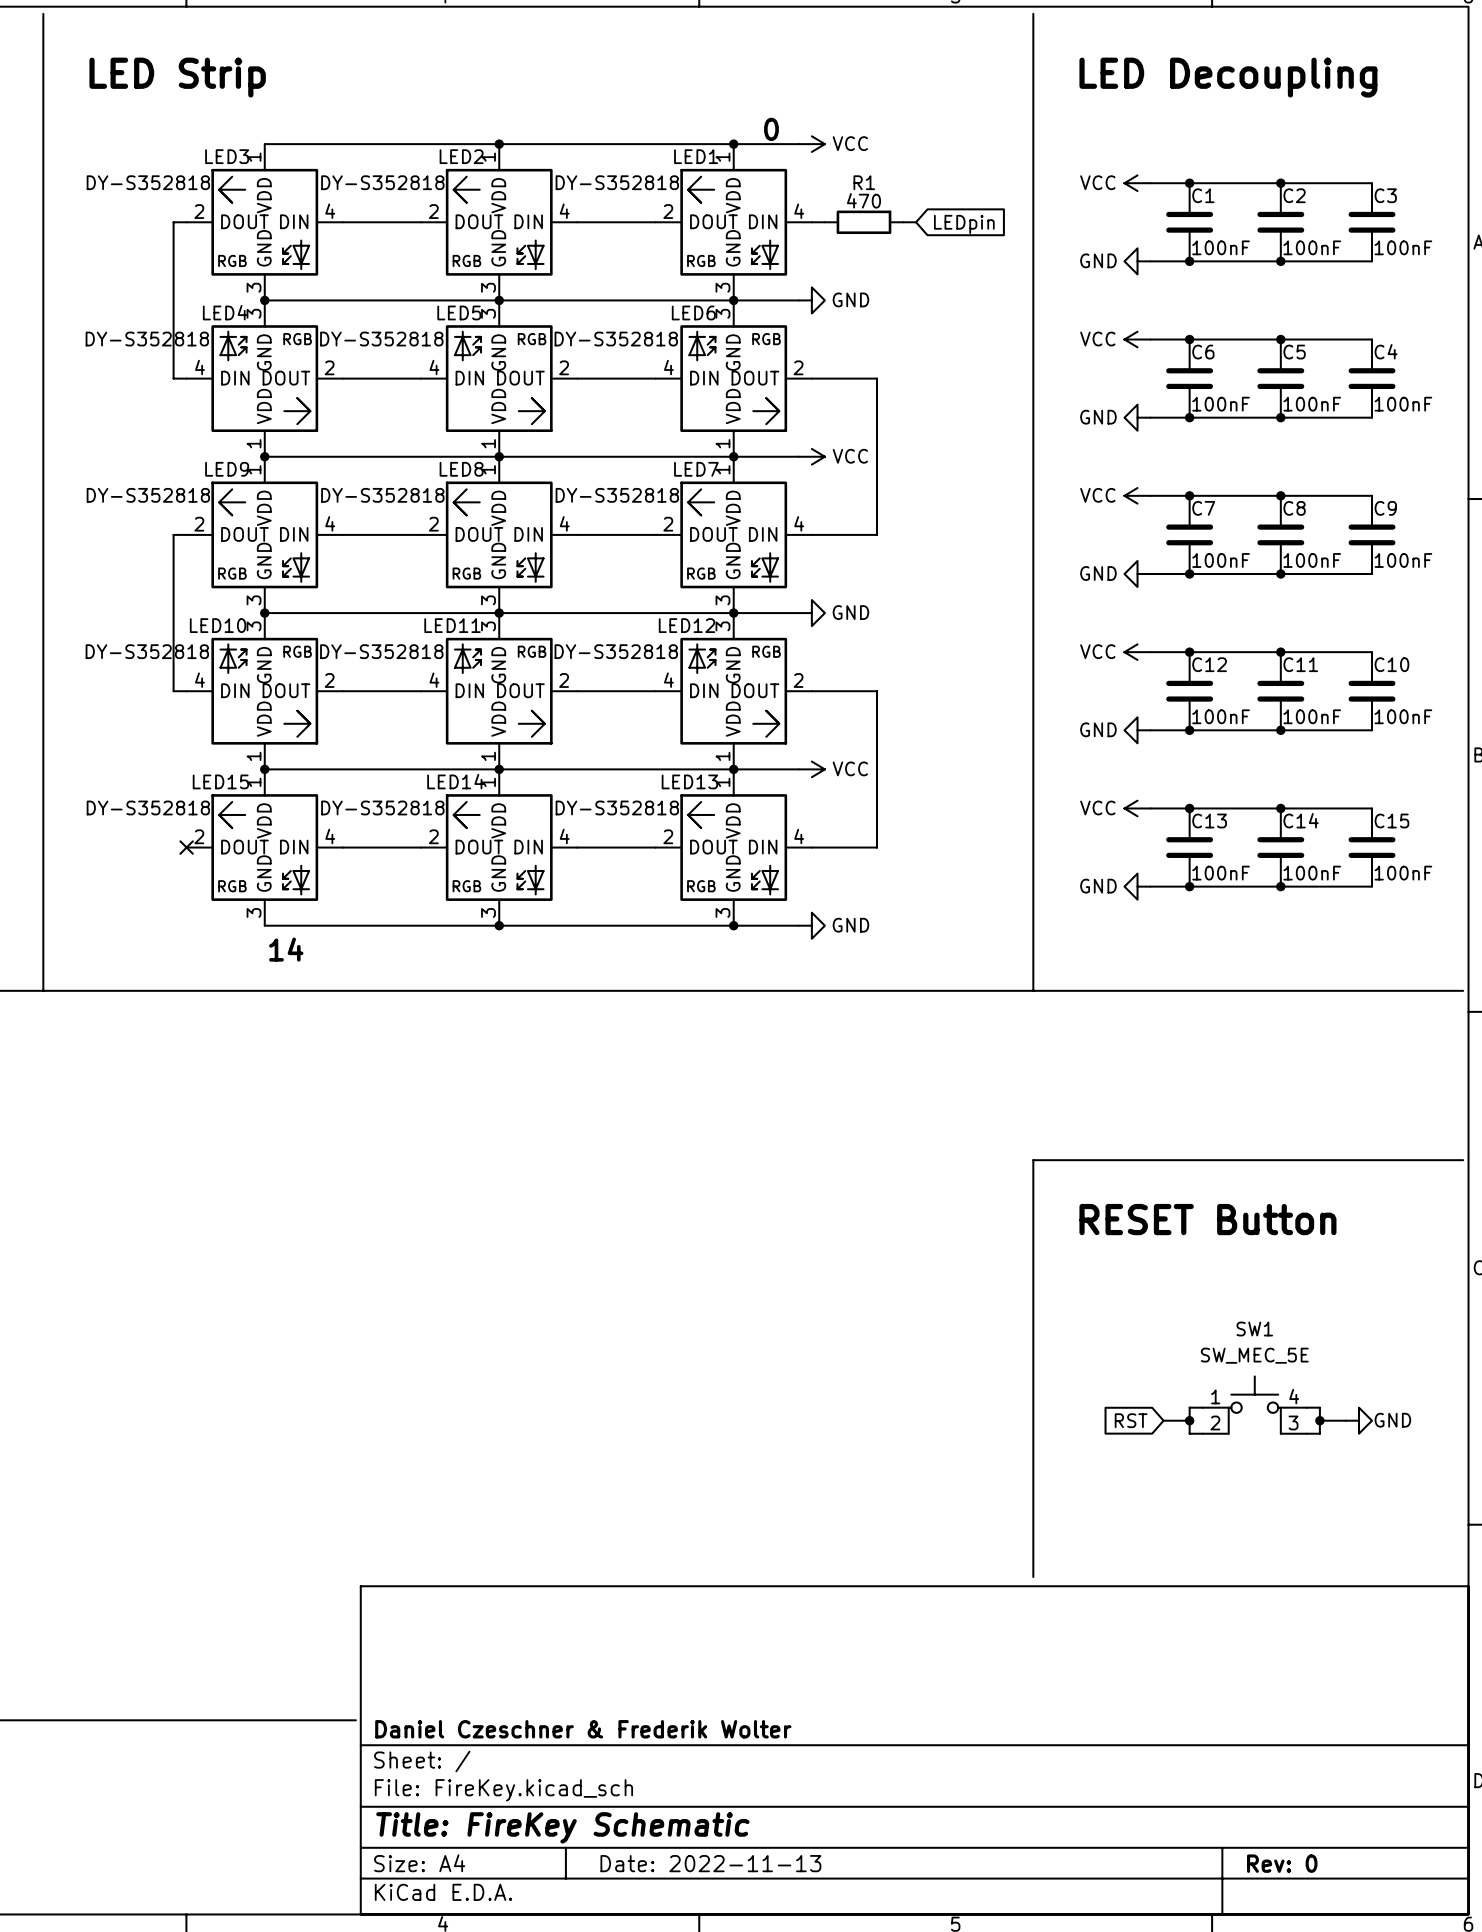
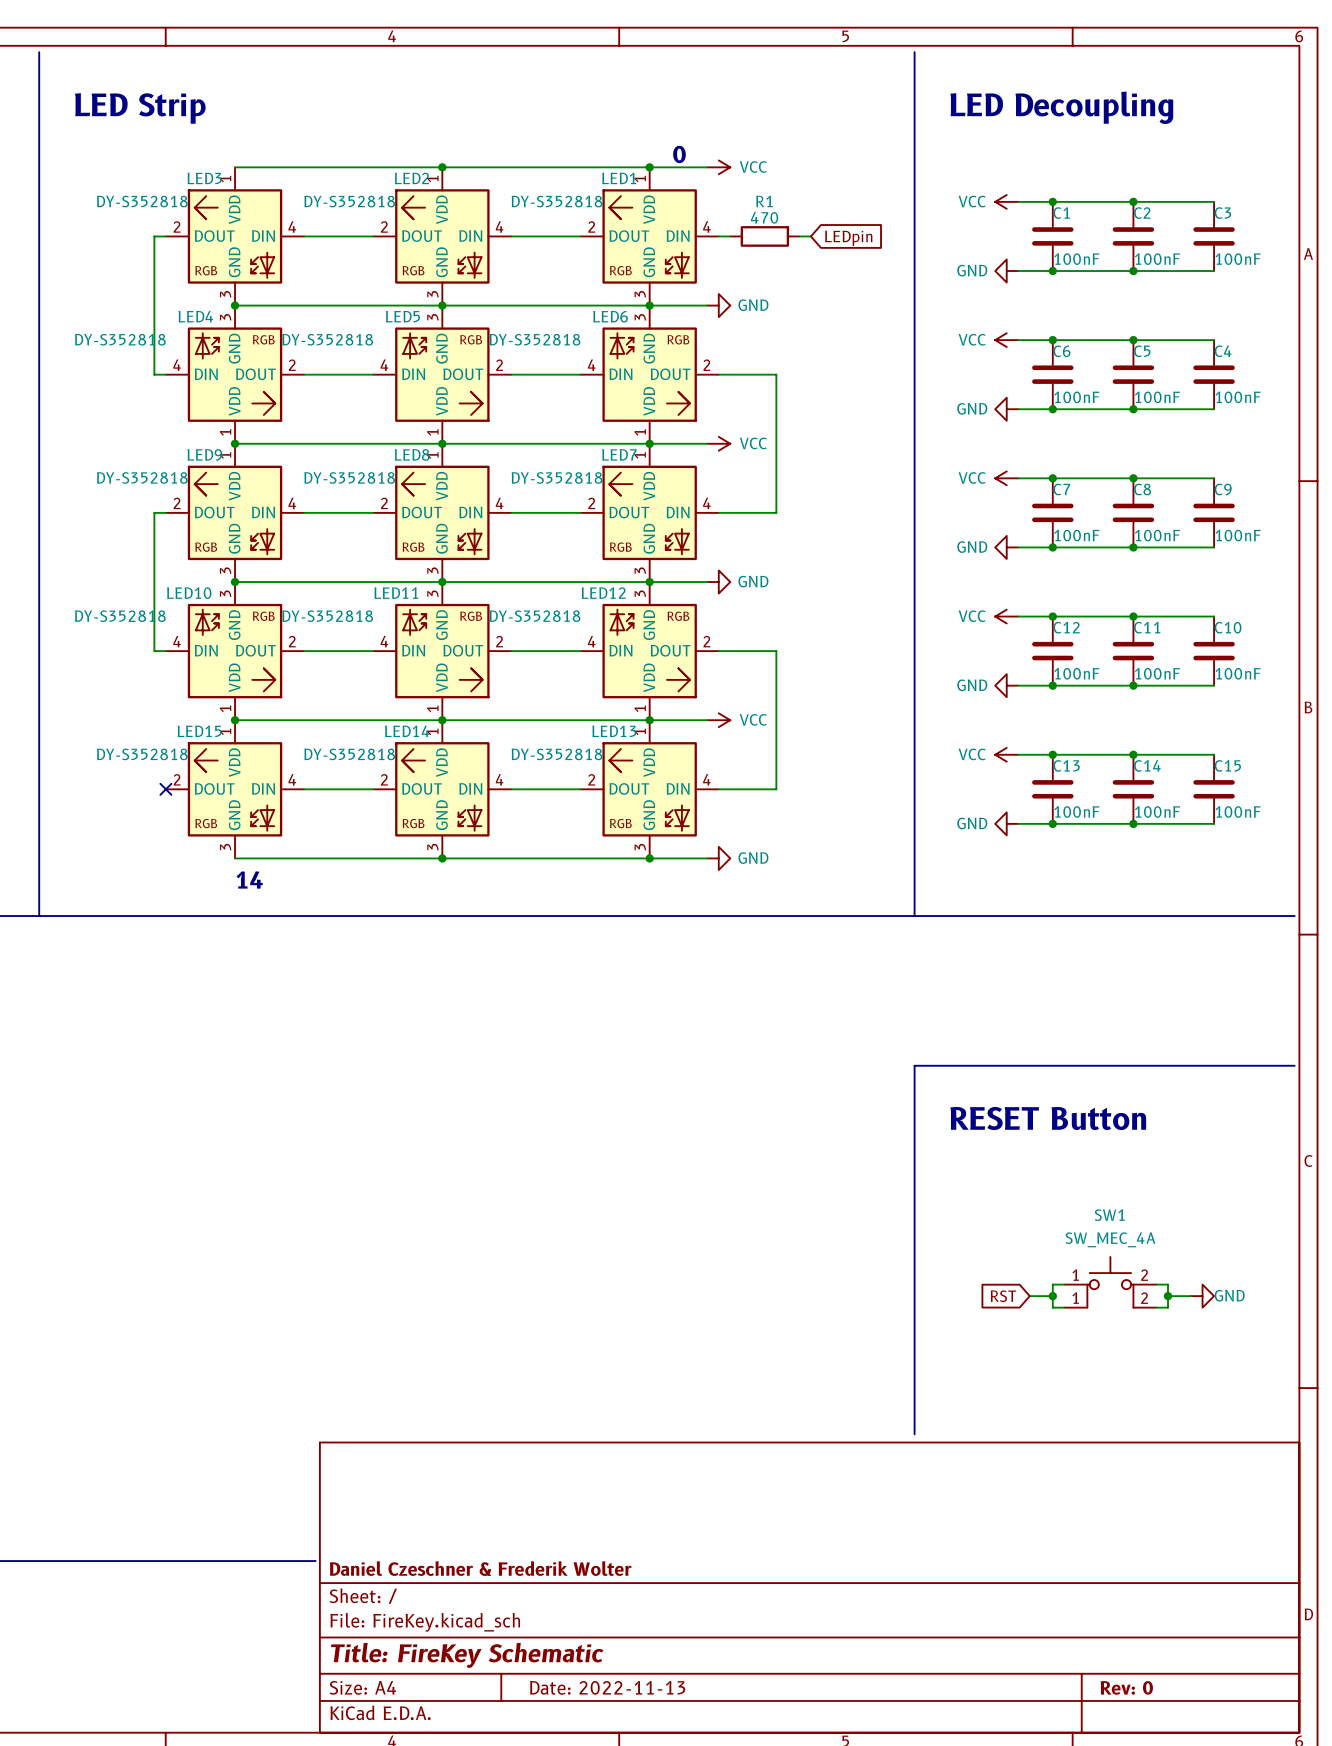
SW1 value: SW_MEC_5E (1254, 1355) -> SW_MEC_4A (1110, 1239)
SW1 pin number: 4 (1294, 1396) -> 2 (1144, 1275)
SW1 pin number: 2 (1215, 1422) -> 1 (1075, 1298)
SW1 pin number: 3 (1293, 1422) -> 2 (1144, 1298)

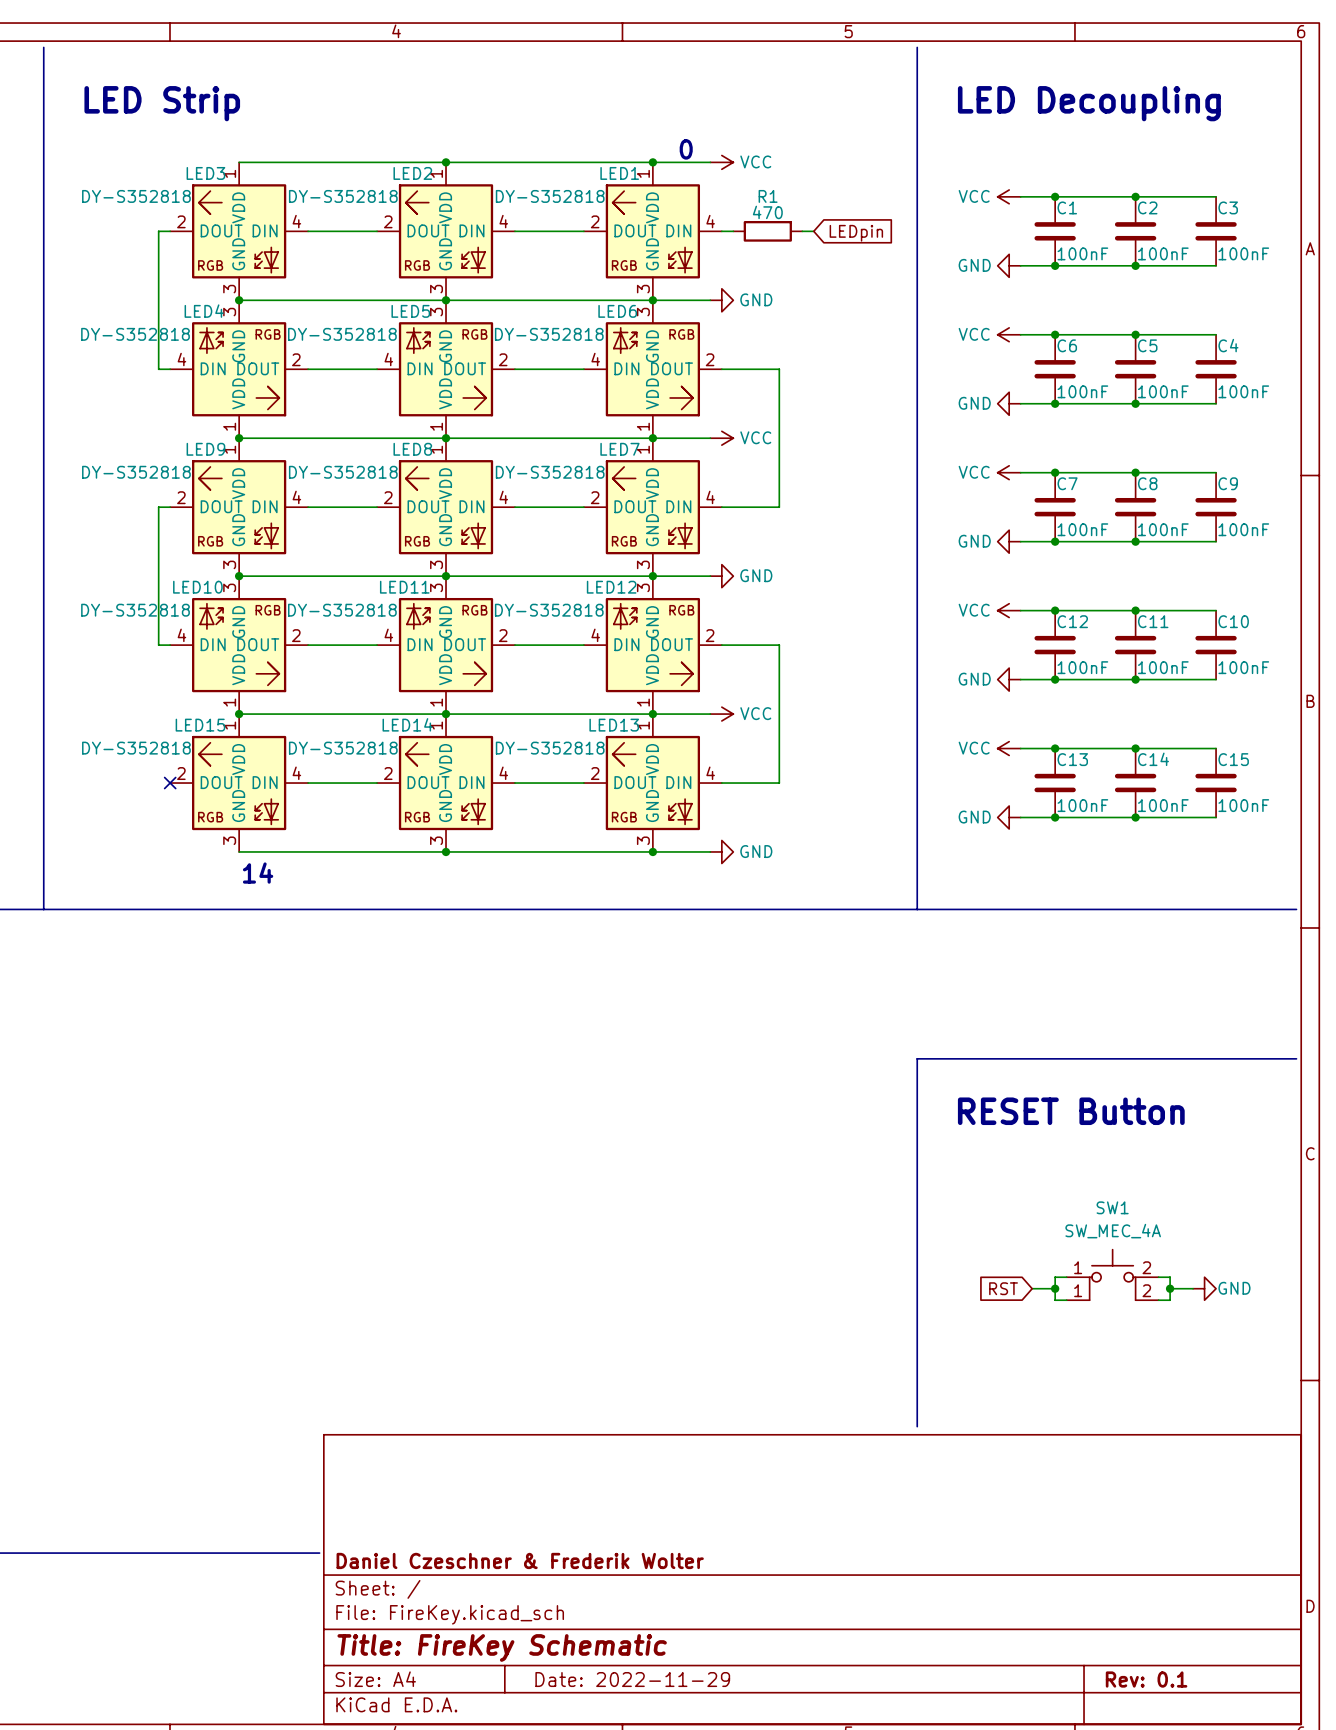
title block: Date: 2022-11-13 (607, 1687) -> Date: 2022-11-29 (632, 1679)
title block: Rev: 0 (1126, 1687) -> Rev: 0.1 (1146, 1679)

